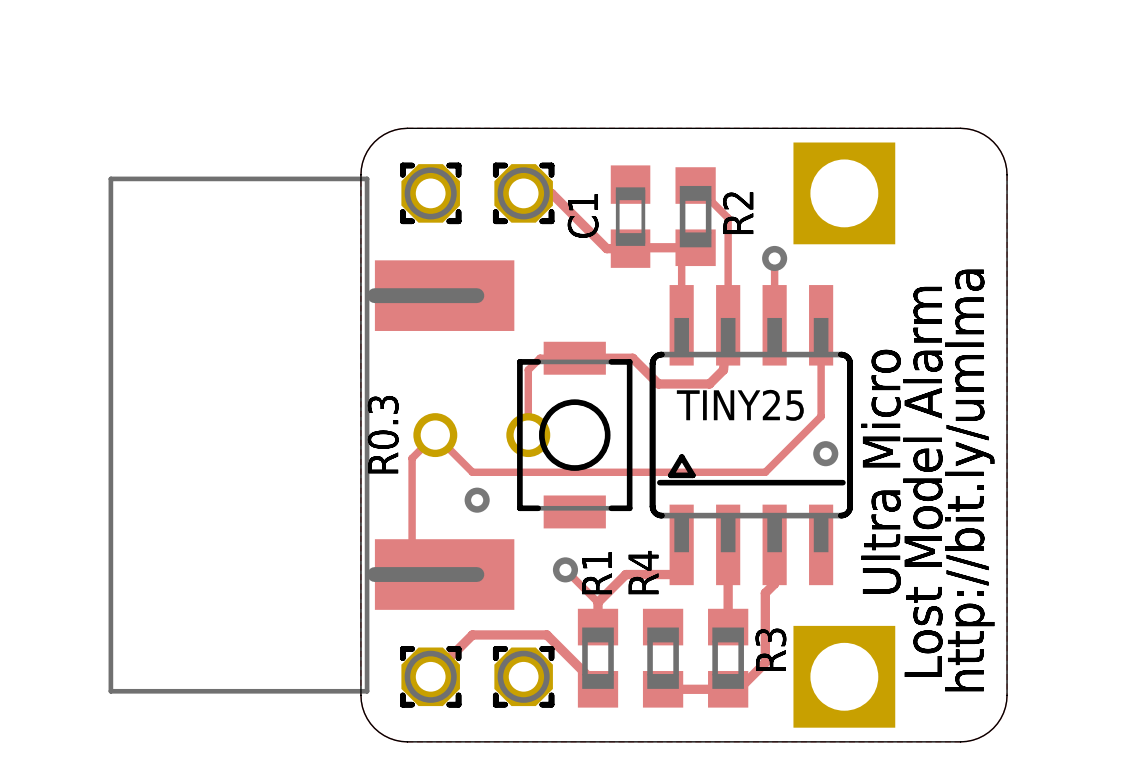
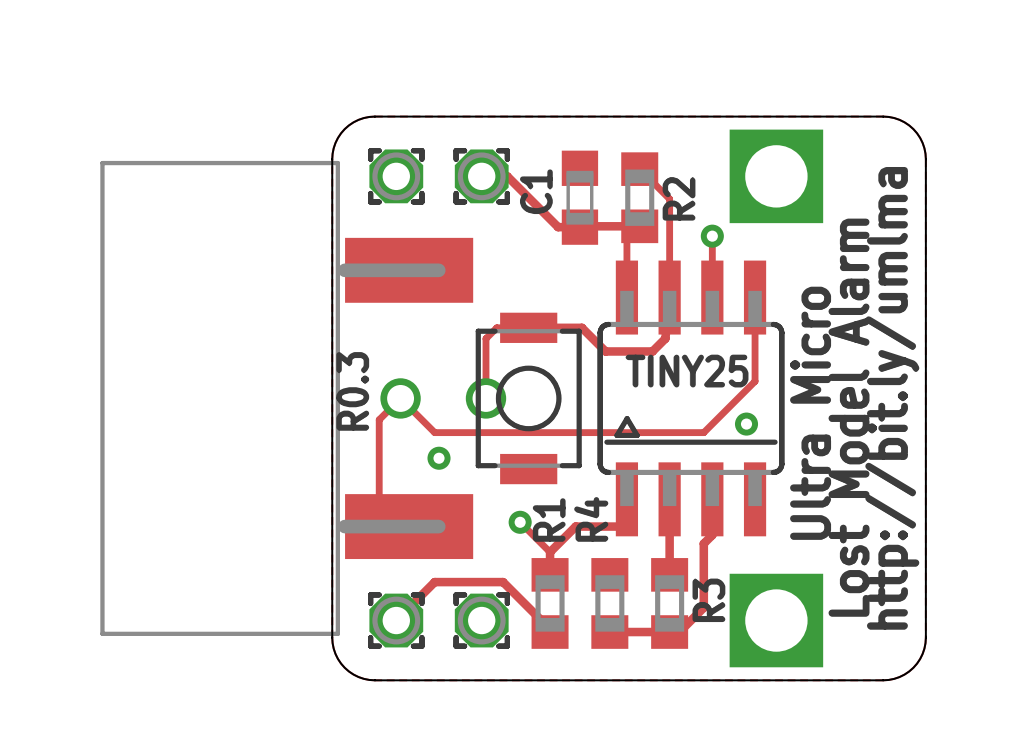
via position: (825, 453) -> (746, 424)

